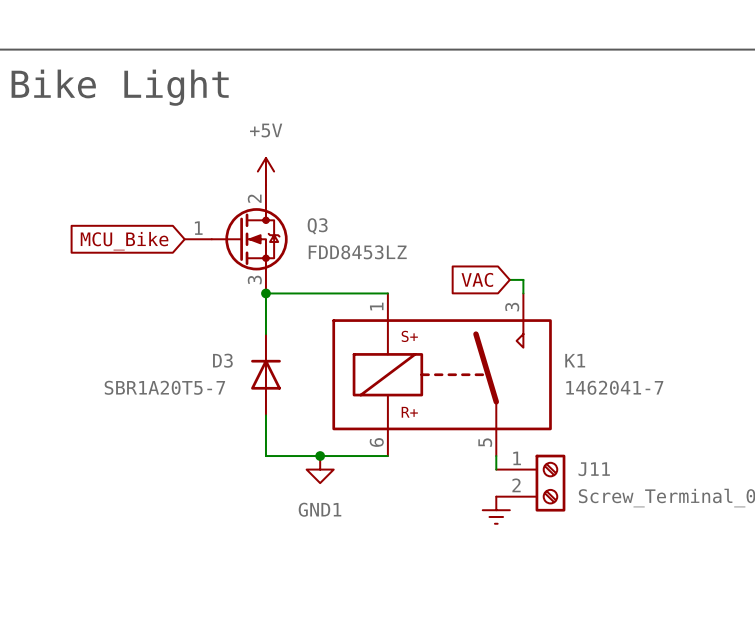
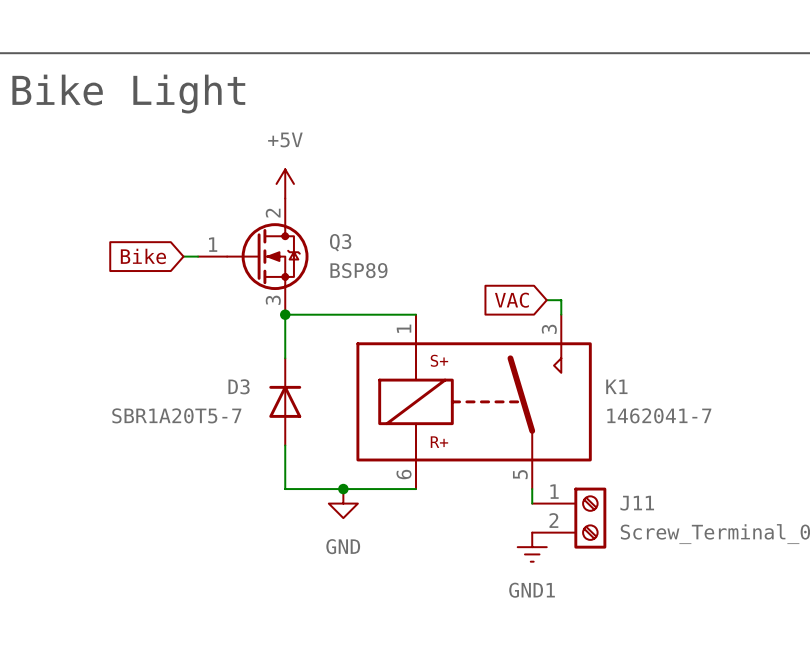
wire: none -> (183, 256) (198, 256)
global label: MCU_Bike (124, 241) -> Bike (143, 256)
Q3 value: FDD8453LZ (357, 252) -> BSP89 (358, 270)
power symbol: GND1 (320, 469) -> GND (343, 503)
power symbol text: none -> GND1 (532, 590)

